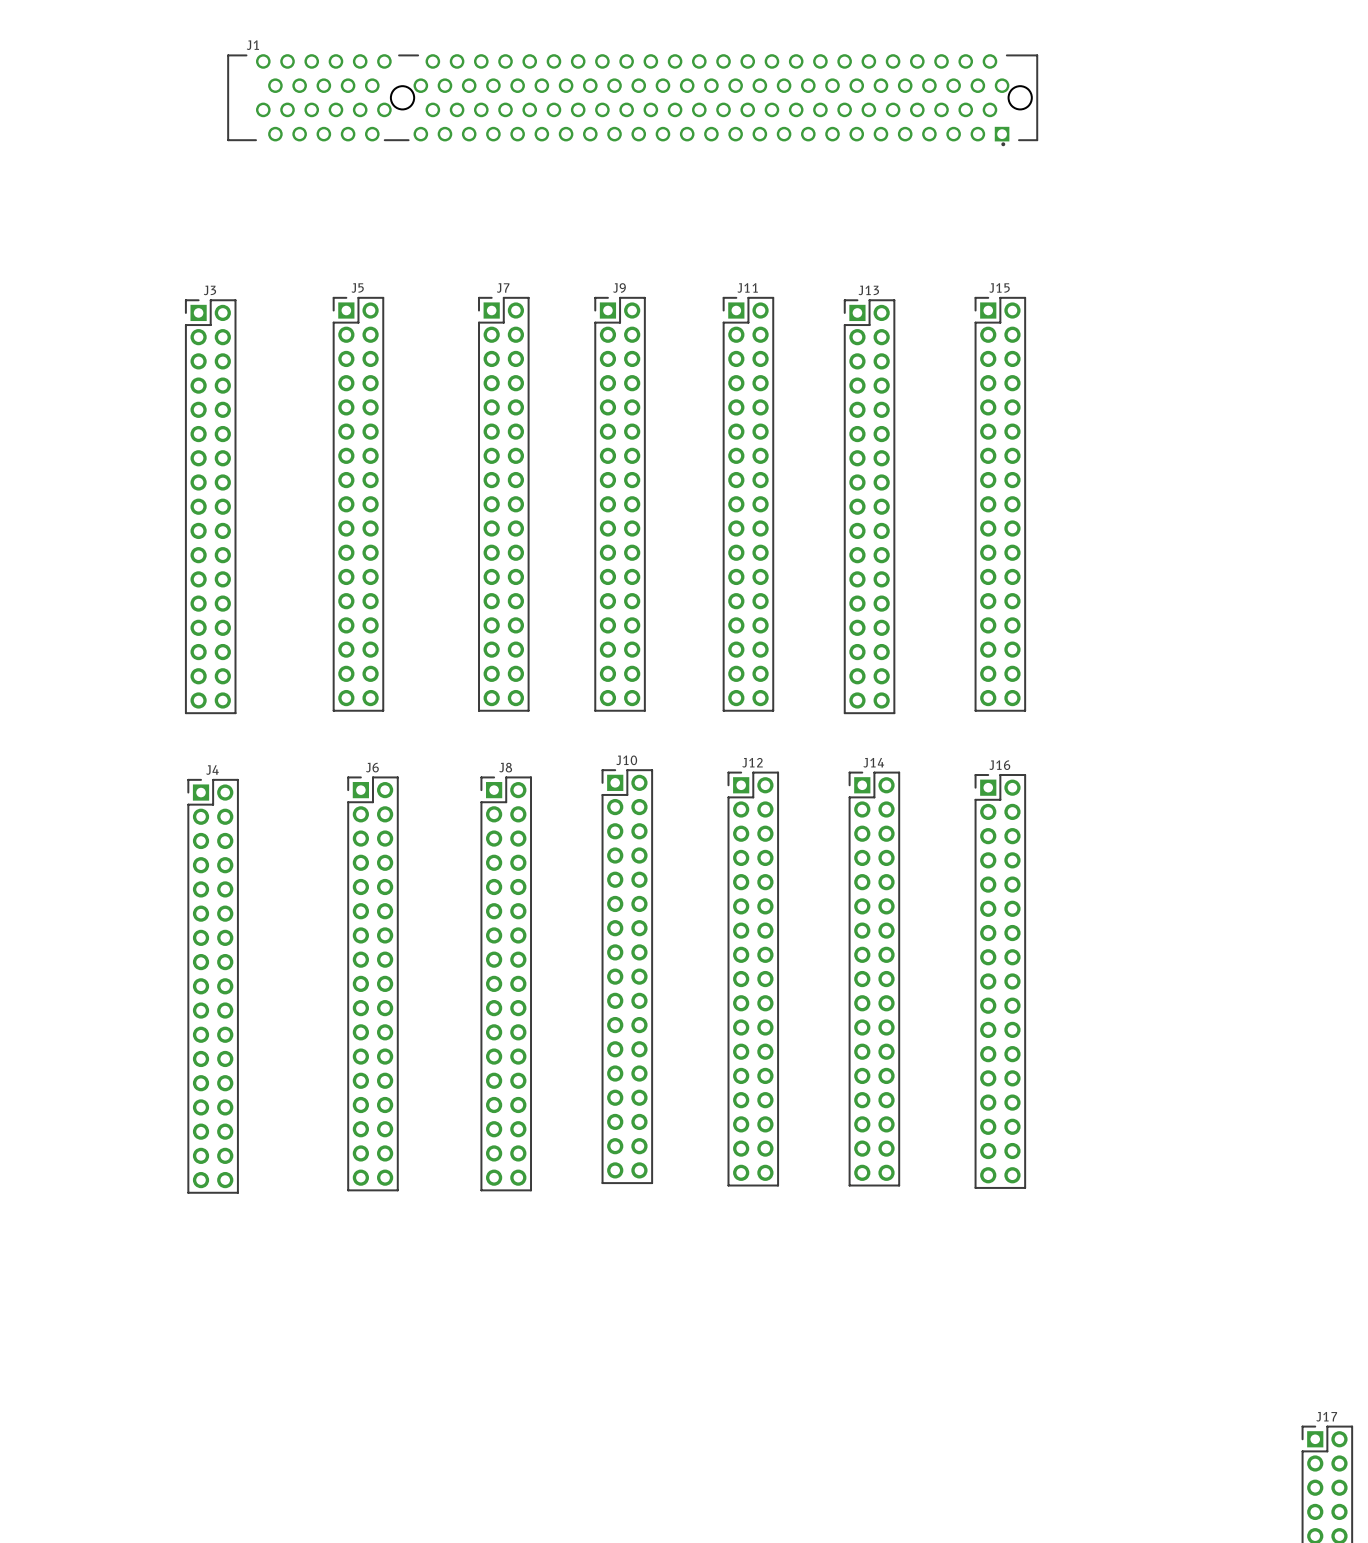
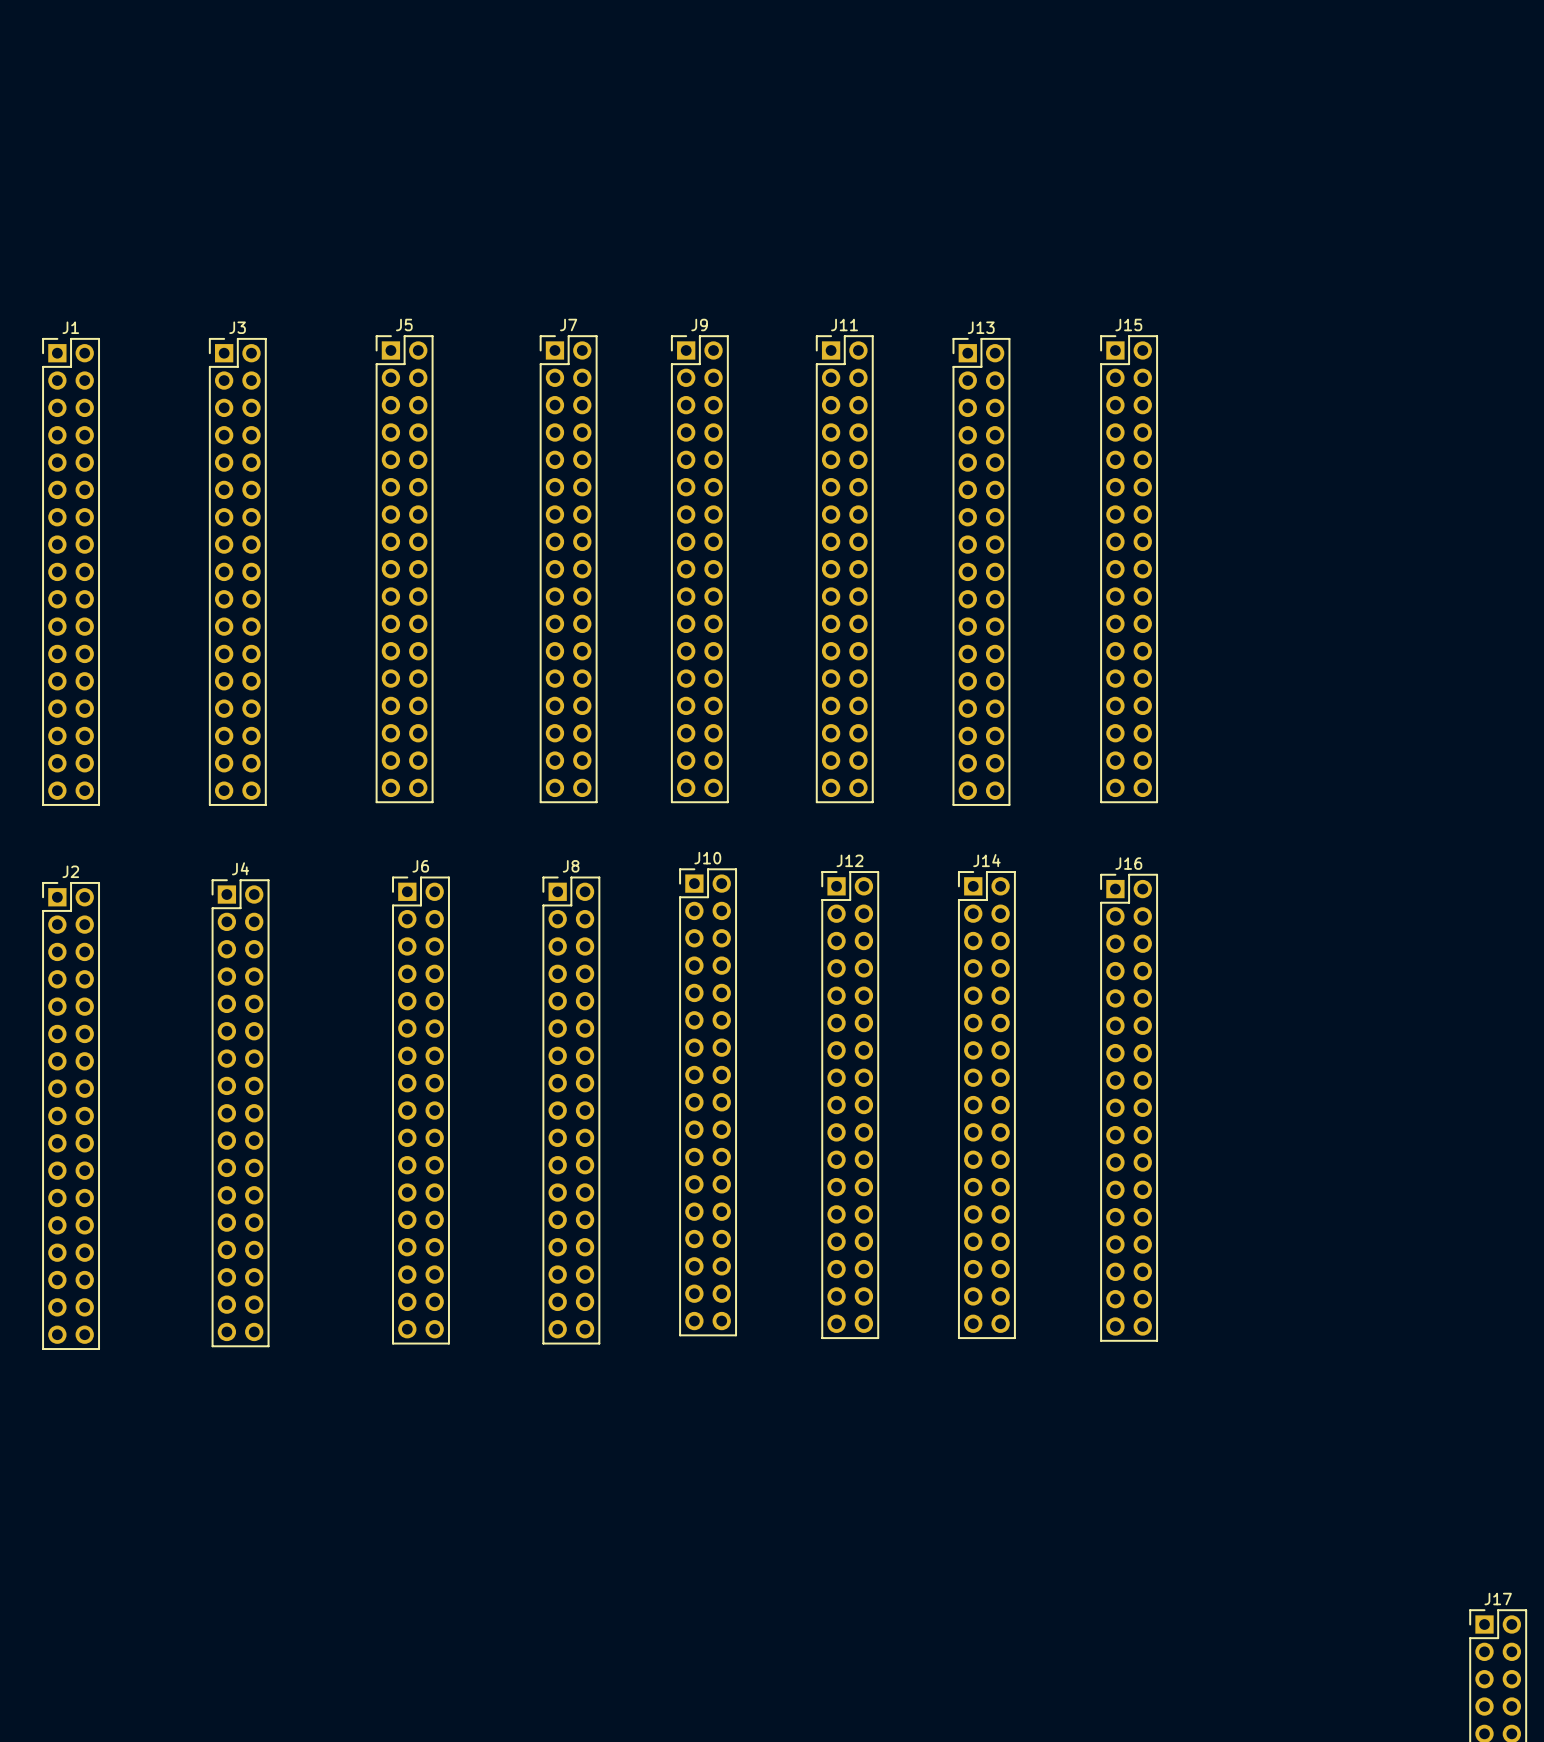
J1 name position: J1 (252, 45) -> J1 (70, 327)
J1 footprint: [227, 54, 1038, 147] -> [42, 338, 100, 806]
J2: none -> (71, 1115)

